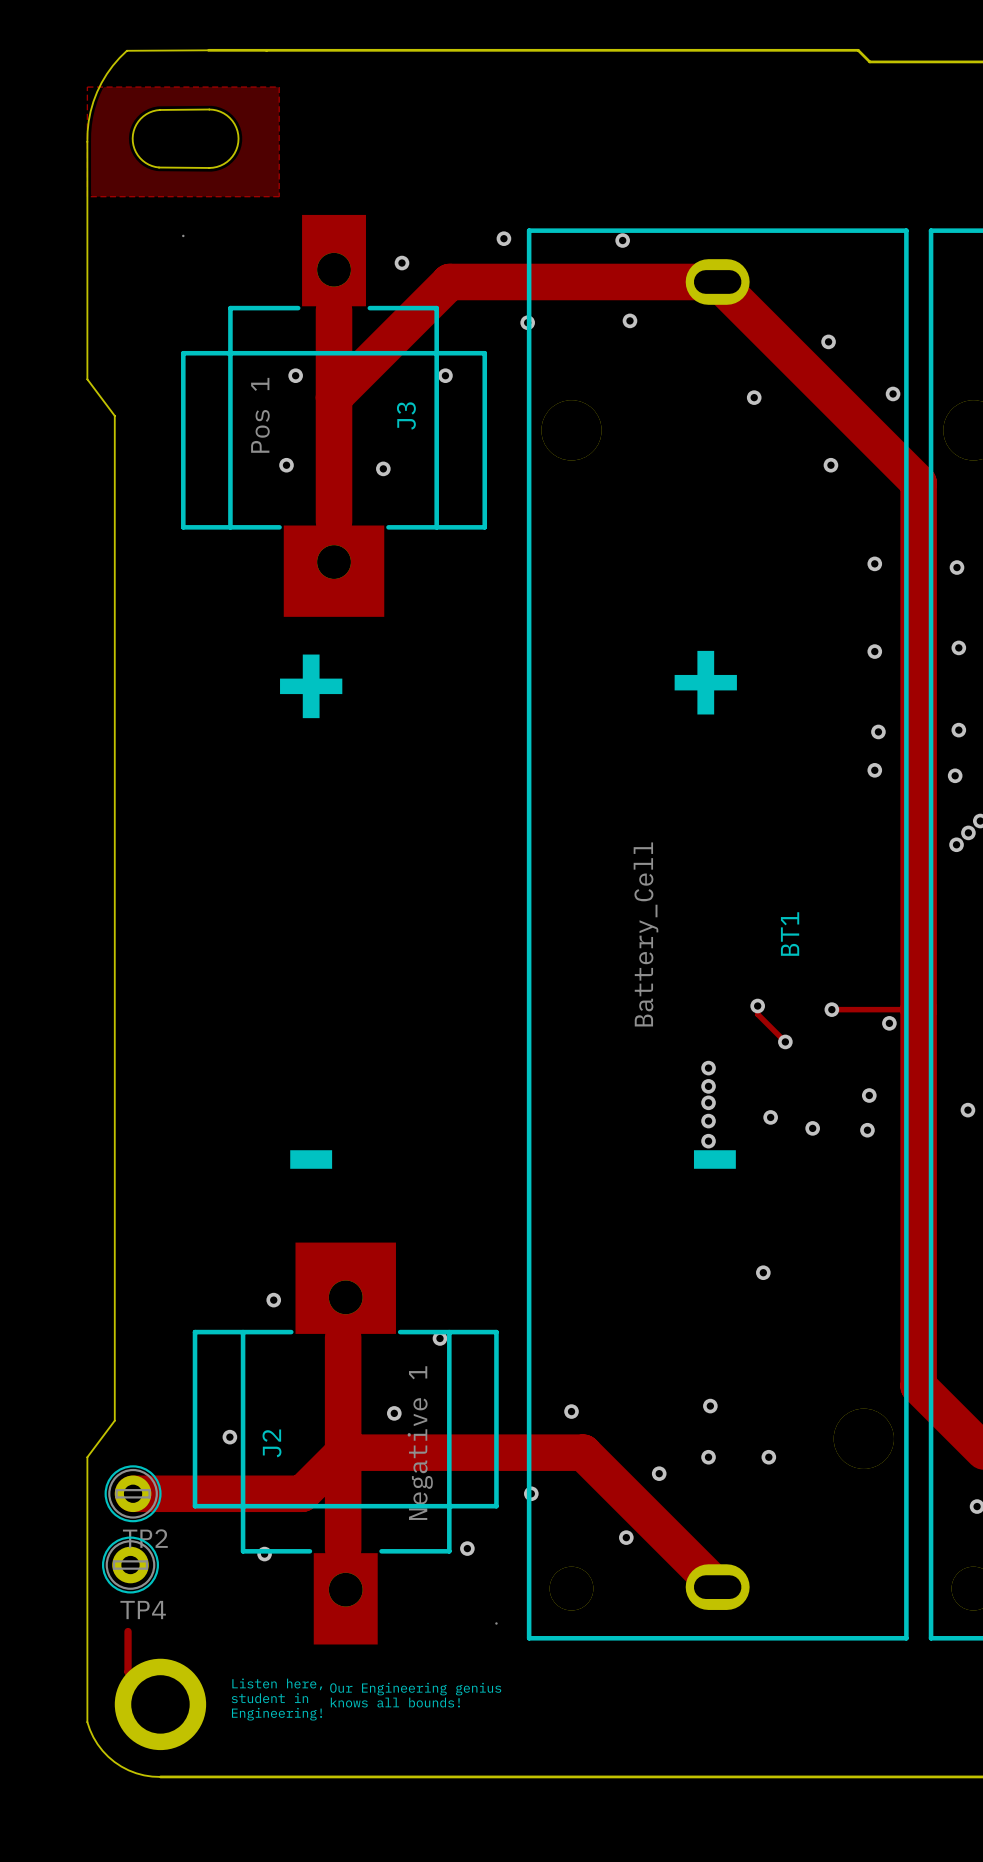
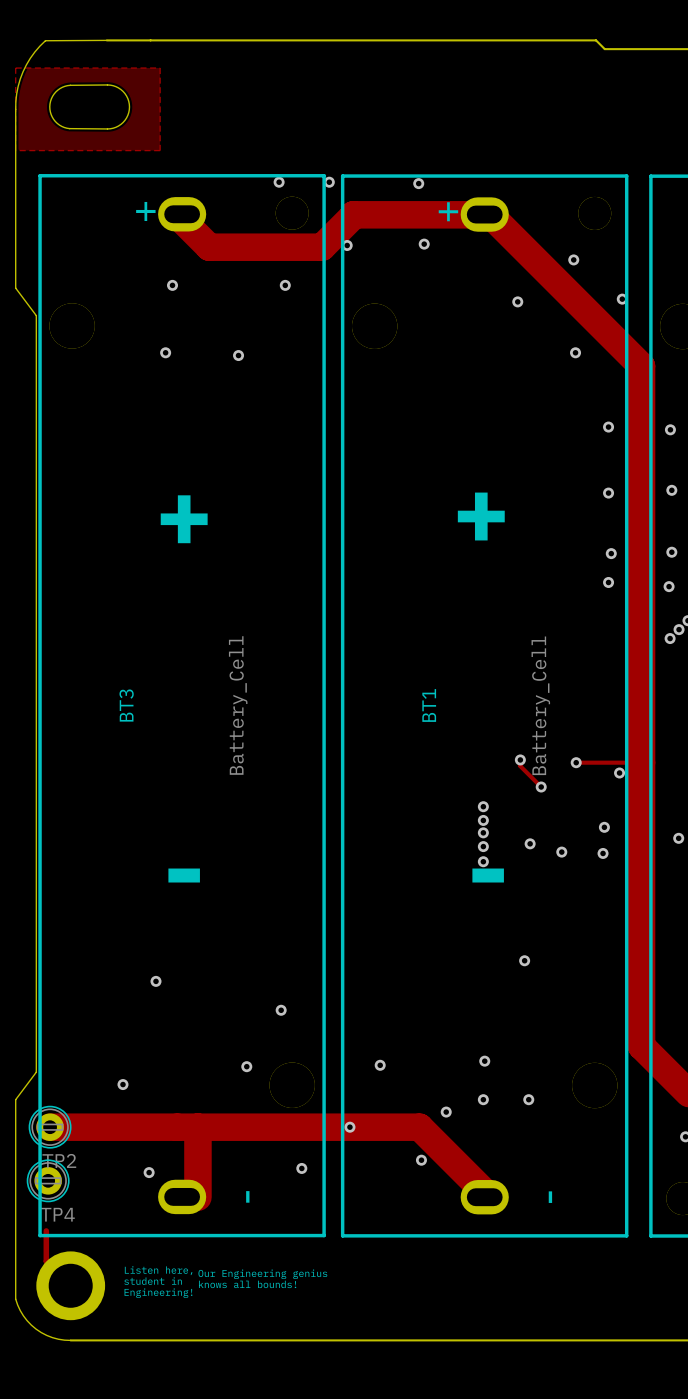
BT1 footprint: [526, 228, 909, 1641] -> [340, 174, 629, 1238]
via position: (401, 263) -> (279, 182)
track: (535, 281) (449, 281) (334, 397) -> (353, 214) (321, 247) (209, 247) (179, 217)
track: (334, 309) (334, 522) -> none
J3: Pos 1 (334, 415) -> none
BT3: none -> Battery_Cell (182, 705)
BT1 value position: Battery_Cell (645, 934) -> Battery_Cell (540, 705)
BT1 name position: BT1 (790, 934) -> BT1 (429, 705)
track: (343, 1337) (343, 1549) -> none
J2: Negative 1 (345, 1443) -> none
track: (302, 1493) (343, 1452) (583, 1452) (717, 1587) -> (177, 1127) (419, 1127) (486, 1194)
track: none -> (197, 1127) (197, 1197)

